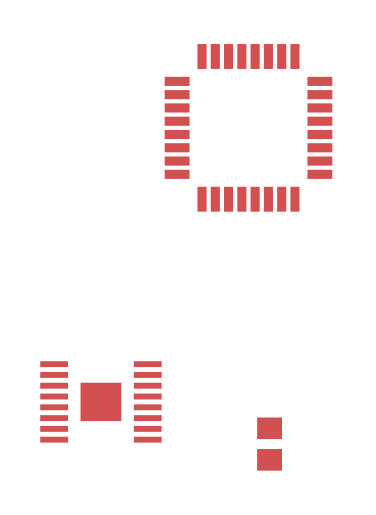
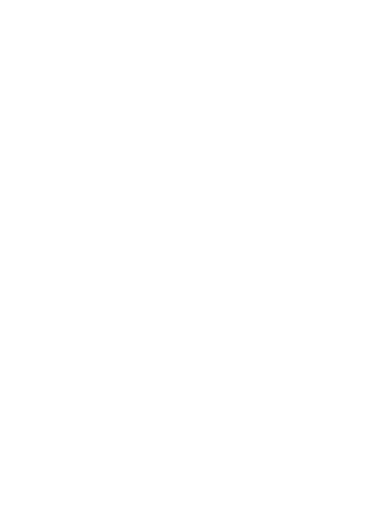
part: (248, 127) -> none
part: (100, 401) -> none
part: (269, 444) -> none

